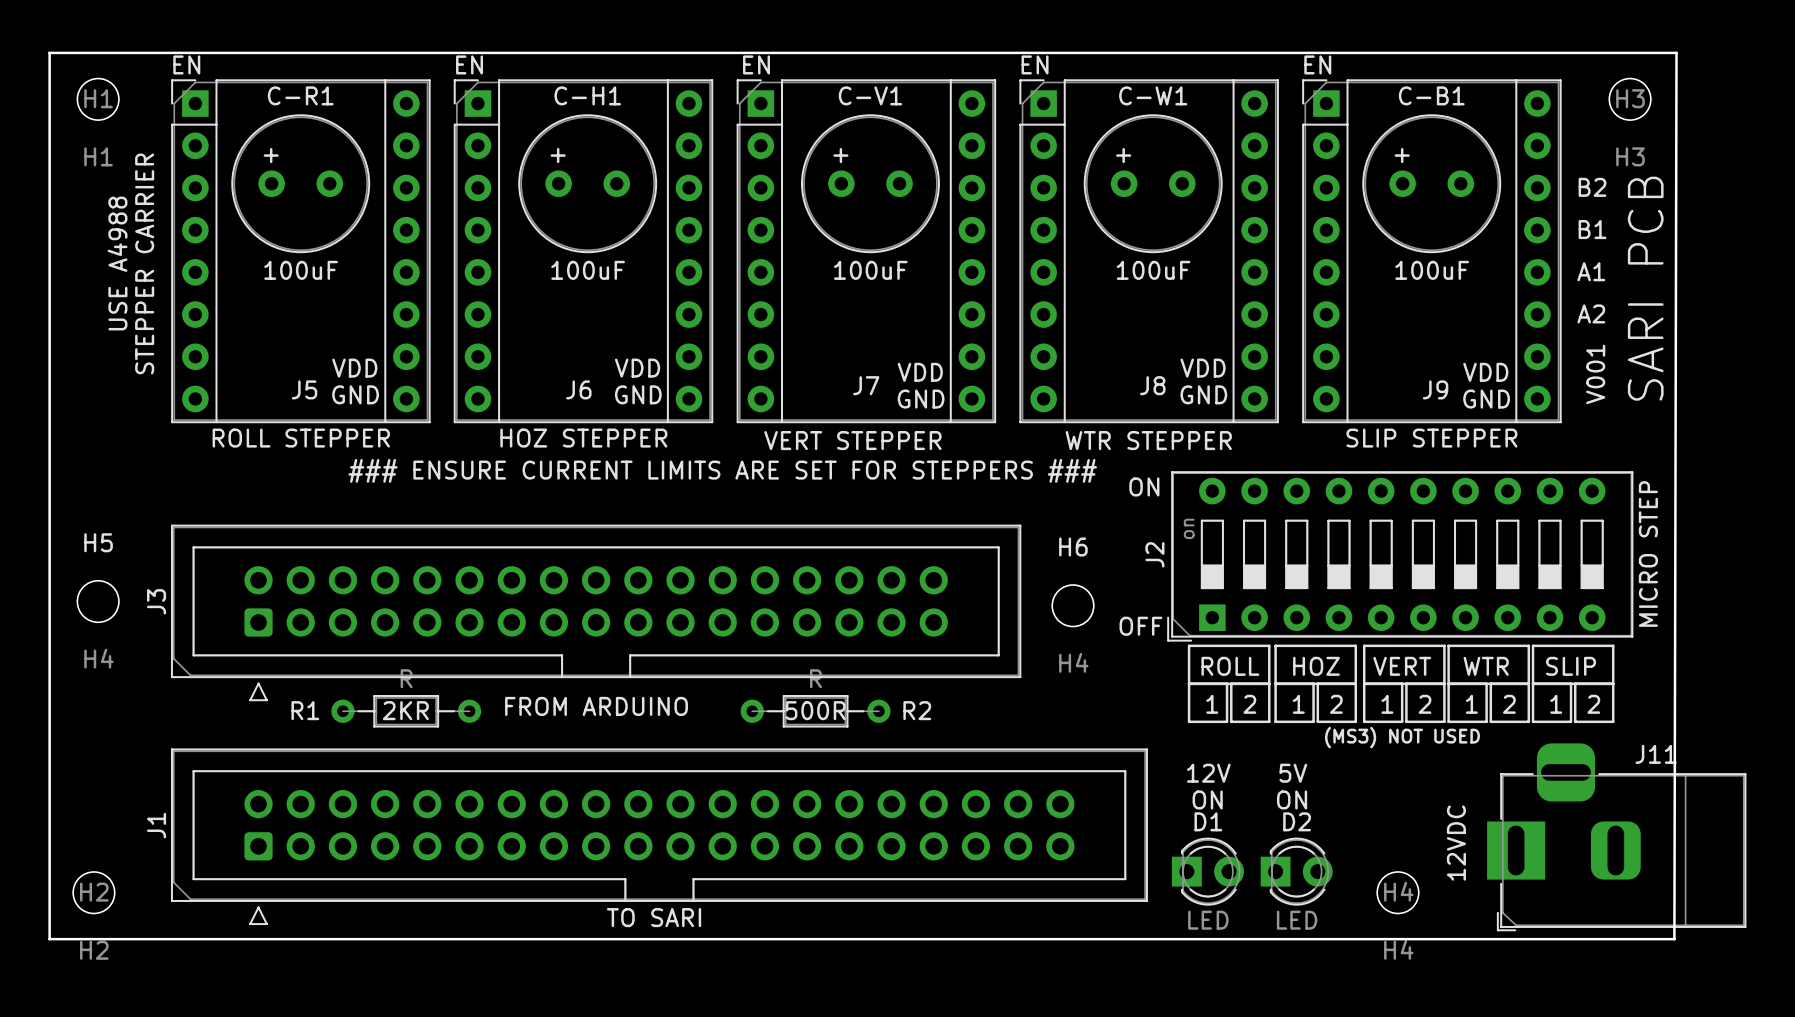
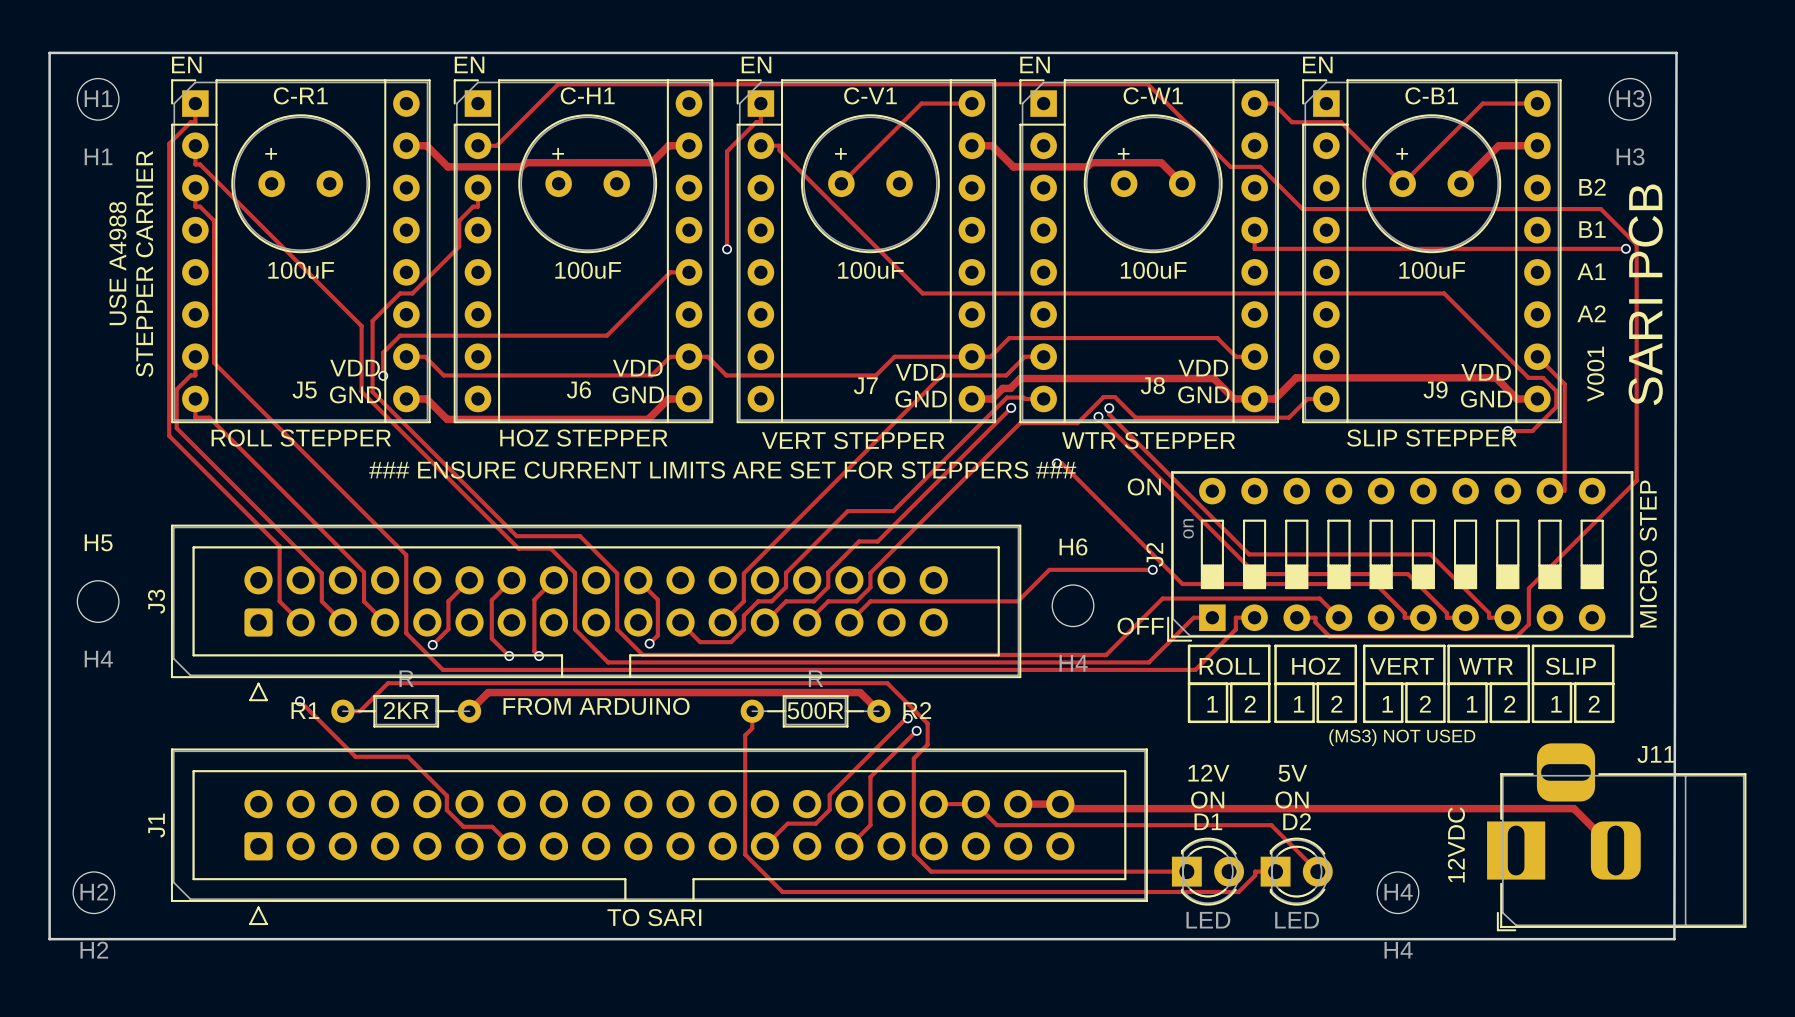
track: none -> (195, 103) (195, 122) (190, 122) (169, 143) (169, 435) (279, 546) (279, 601) (300, 622)
track: none -> (760, 103) (760, 122) (756, 122) (727, 151) (727, 249)
track: none -> (971, 103) (921, 103) (841, 183)
track: none -> (1254, 103) (1273, 103) (1292, 122) (1341, 122) (1402, 183) (1482, 103) (1537, 103)
track: none -> (195, 145) (195, 164) (200, 164) (361, 326) (361, 391) (518, 548) (550, 548) (575, 572) (575, 629) (608, 662) (1148, 662) (1193, 617) (1212, 617)
track: none -> (406, 145) (426, 145) (447, 166) (521, 166) (525, 162) (651, 162) (668, 145) (688, 145)
track: none -> (477, 145) (496, 145) (558, 84) (1147, 84) (1230, 166) (1260, 166) (1302, 209) (1600, 209) (1636, 244) (1636, 480) (1528, 588) (1528, 624) (1516, 636) (1329, 636) (1315, 622) (1315, 617) (1296, 617)
track: none -> (760, 145) (779, 145) (779, 150) (922, 293) (1444, 293) (1528, 377) (1543, 377) (1556, 391) (1556, 407) (1532, 431) (1507, 431)
track: none -> (971, 145) (992, 145) (1013, 166) (1087, 166) (1091, 162) (1161, 162) (1182, 183)
track: none -> (1537, 145) (1498, 145) (1460, 183)
track: none -> (195, 187) (195, 206) (200, 206) (214, 220) (214, 362) (406, 555) (406, 633) (442, 669) (1195, 669) (1235, 629) (1235, 617) (1254, 617)
track: none -> (477, 187) (477, 206) (473, 206) (459, 220) (459, 246) (412, 293) (400, 293) (372, 320) (372, 391) (516, 536) (580, 536) (617, 573) (617, 629) (642, 654) (1106, 654) (1162, 598) (1319, 598) (1338, 617)
track: none -> (1254, 230) (1254, 248) (1625, 248)
via: none -> (1625, 248)
via: none -> (727, 249)
track: none -> (688, 272) (670, 272) (606, 335) (400, 335) (383, 352) (383, 375)
track: none -> (195, 356) (195, 375) (190, 375) (176, 389) (176, 428) (321, 573) (321, 601) (342, 622)
track: none -> (406, 356) (425, 356) (443, 375) (651, 375) (670, 356) (707, 356) (726, 375) (875, 375) (894, 356) (990, 356) (1009, 338) (1217, 338) (1235, 356) (1254, 356)
track: none -> (1043, 356) (1024, 356) (1006, 375) (941, 375) (743, 573) (743, 601) (722, 622)
track: none -> (1537, 356) (1564, 384) (1564, 491)
via: none -> (383, 375)
track: none -> (195, 398) (195, 417) (209, 417) (364, 572) (364, 601) (385, 622)
track: none -> (406, 398) (426, 398) (447, 419) (648, 419) (668, 398) (688, 398)
track: none -> (971, 398) (992, 398) (1002, 388) (1010, 388) (1020, 378) (1213, 378) (1234, 398) (1275, 398) (1296, 377) (1495, 377) (1517, 398) (1537, 398)
track: none -> (1043, 398) (1006, 397) (893, 511) (847, 511) (786, 572) (786, 587) (771, 601) (758, 601) (743, 615) (743, 629) (731, 642) (700, 642) (680, 622)
track: none -> (1326, 398) (1307, 398) (1289, 417) (1135, 417) (1114, 397) (1103, 397) (1077, 423) (1020, 423) (870, 572) (870, 587) (856, 601) (828, 601) (807, 622)
track: none -> (1011, 407) (877, 541) (859, 541) (828, 572) (828, 587) (813, 601) (786, 601) (764, 622)
via: none -> (1011, 407)
track: none -> (1109, 408) (1109, 414) (1249, 554) (1430, 554) (1489, 613) (1489, 617) (1507, 617)
via: none -> (1109, 408)
track: none -> (1098, 416) (1255, 574) (1407, 574) (1446, 613) (1446, 617) (1465, 617)
via: none -> (1098, 416)
via: none -> (1507, 431)
track: none -> (1056, 463) (1061, 463) (1182, 584) (1375, 584) (1404, 613) (1404, 617) (1423, 617)
via: none -> (1056, 463)
track: none -> (1152, 569) (1049, 569) (1017, 601) (870, 601) (849, 622)
via: none -> (1152, 569)
track: none -> (469, 580) (448, 601) (448, 629) (432, 644)
track: none -> (511, 580) (491, 600) (491, 638) (509, 656)
track: none -> (553, 580) (534, 599) (534, 651) (539, 656)
track: none -> (638, 580) (657, 599) (657, 635) (649, 643)
via: none -> (649, 643)
via: none -> (432, 644)
via: none -> (509, 656)
via: none -> (539, 656)
track: none -> (300, 701) (355, 756) (407, 756) (446, 795) (446, 810) (463, 826) (492, 826) (511, 846)
via: none -> (300, 701)
track: none -> (342, 711) (359, 711) (387, 683) (887, 683) (927, 723) (927, 744) (913, 758) (913, 854) (931, 871) (1186, 871)
track: none -> (469, 711) (488, 692) (860, 692) (878, 711)
track: none -> (752, 711) (752, 728) (745, 735) (745, 854) (782, 891) (1238, 891) (1255, 875) (1255, 871) (1275, 871)
track: none -> (907, 718) (829, 795) (829, 809) (815, 823) (787, 823) (764, 846)
via: none -> (907, 718)
track: none -> (916, 730) (870, 777) (870, 825) (849, 846)
via: none -> (916, 730)
track: none -> (933, 804) (975, 804) (997, 825) (1271, 825) (1317, 871)
track: none -> (1018, 804) (1060, 804) (1064, 808) (1573, 808) (1615, 850)

